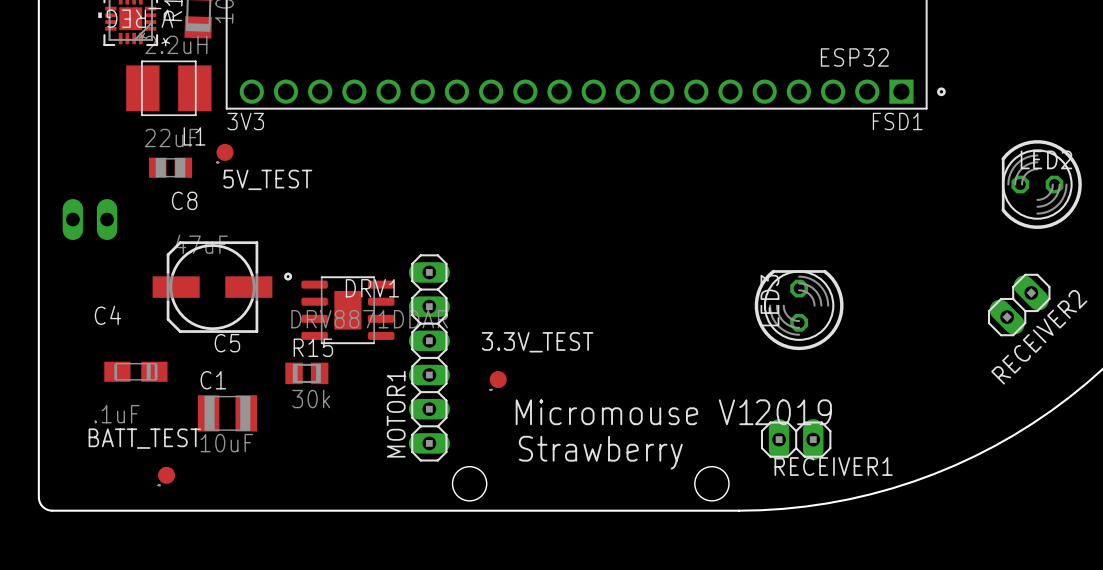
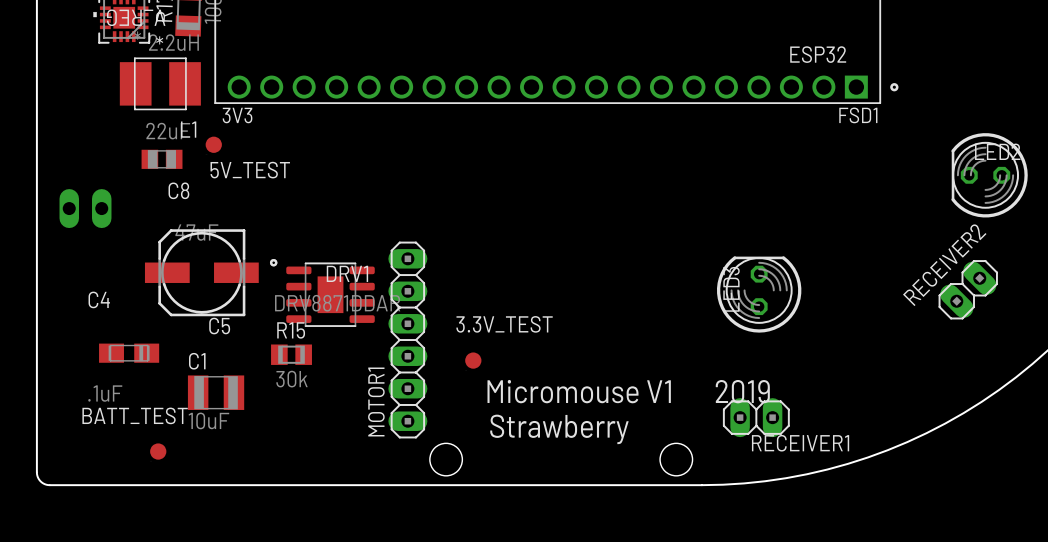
RECEIVER2 name position: RECEIVER2 (1039, 337) -> RECEIVER2 (944, 265)

